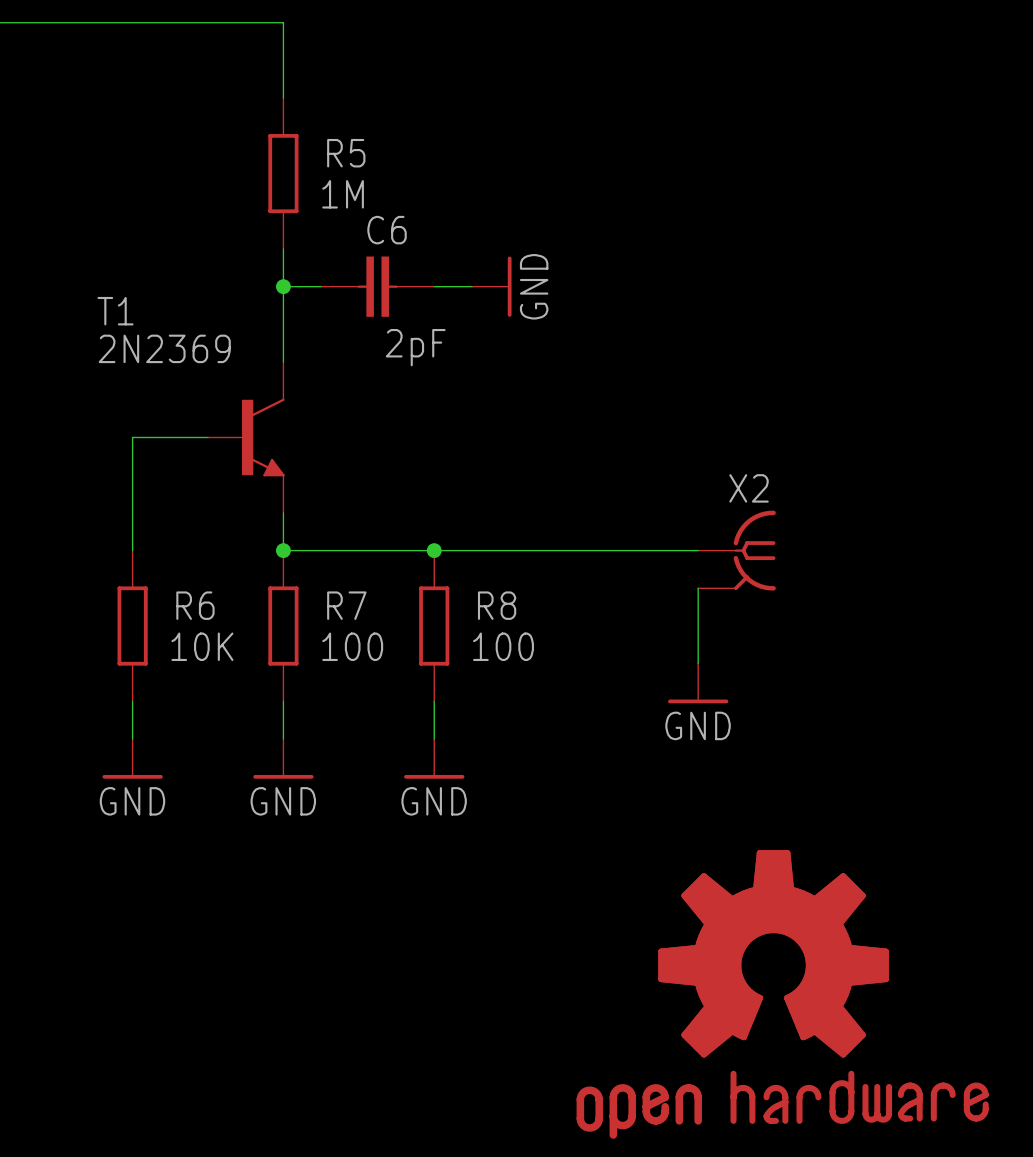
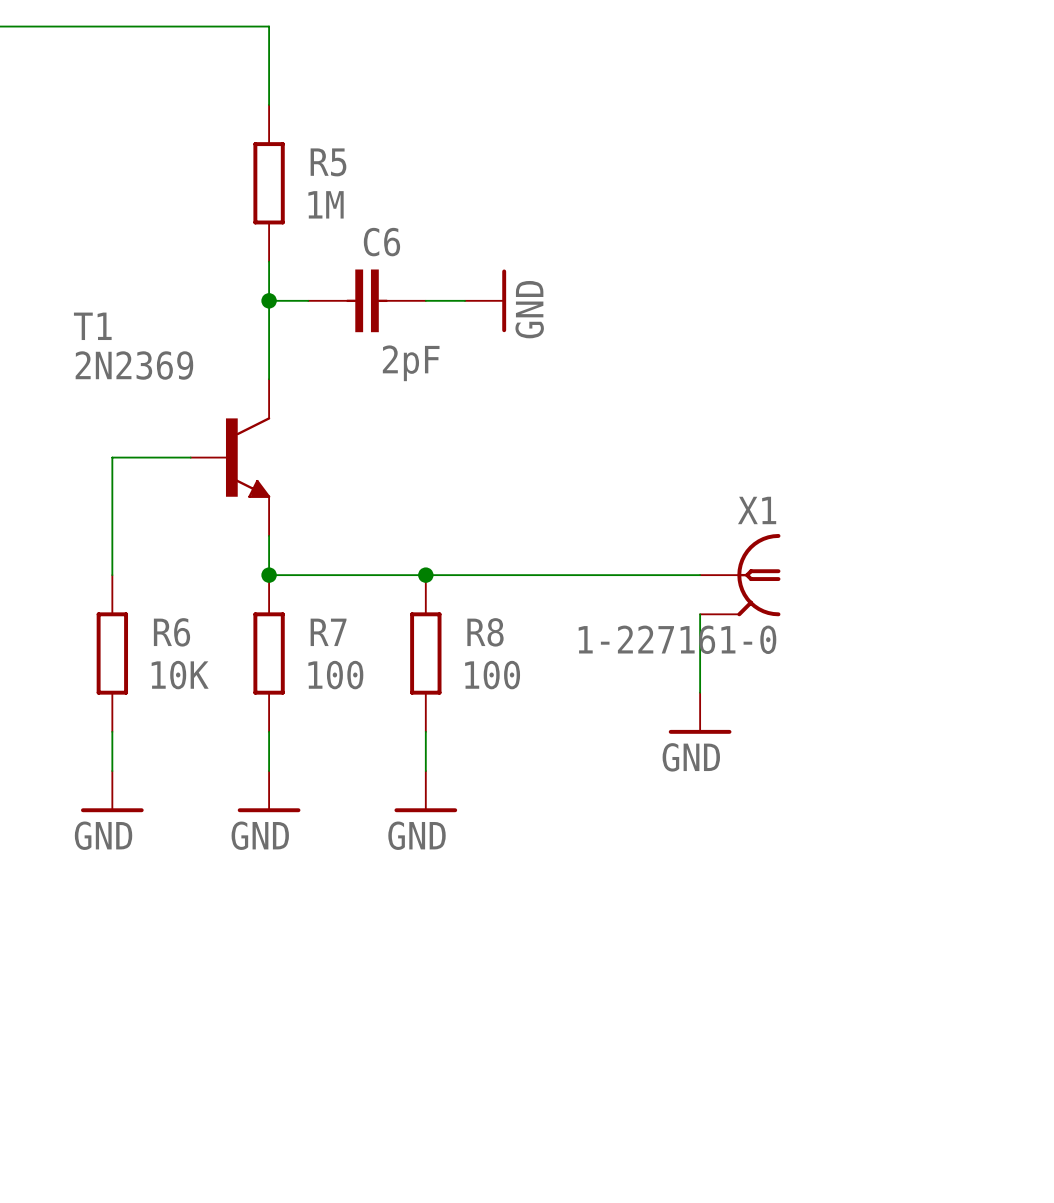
X1: none -> 1-227161-0 (740, 575)
X2: (737, 550) -> none
part: (782, 994) -> none

